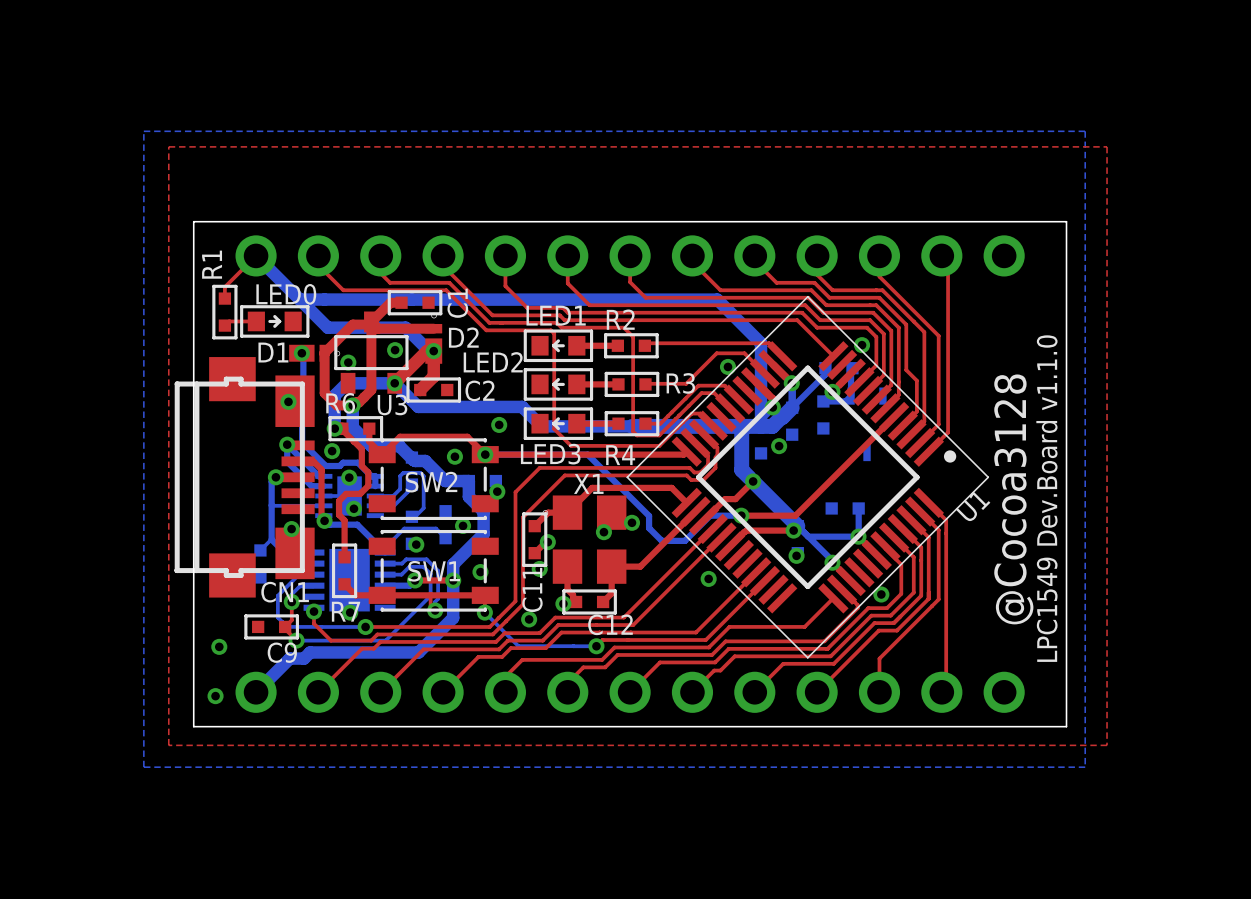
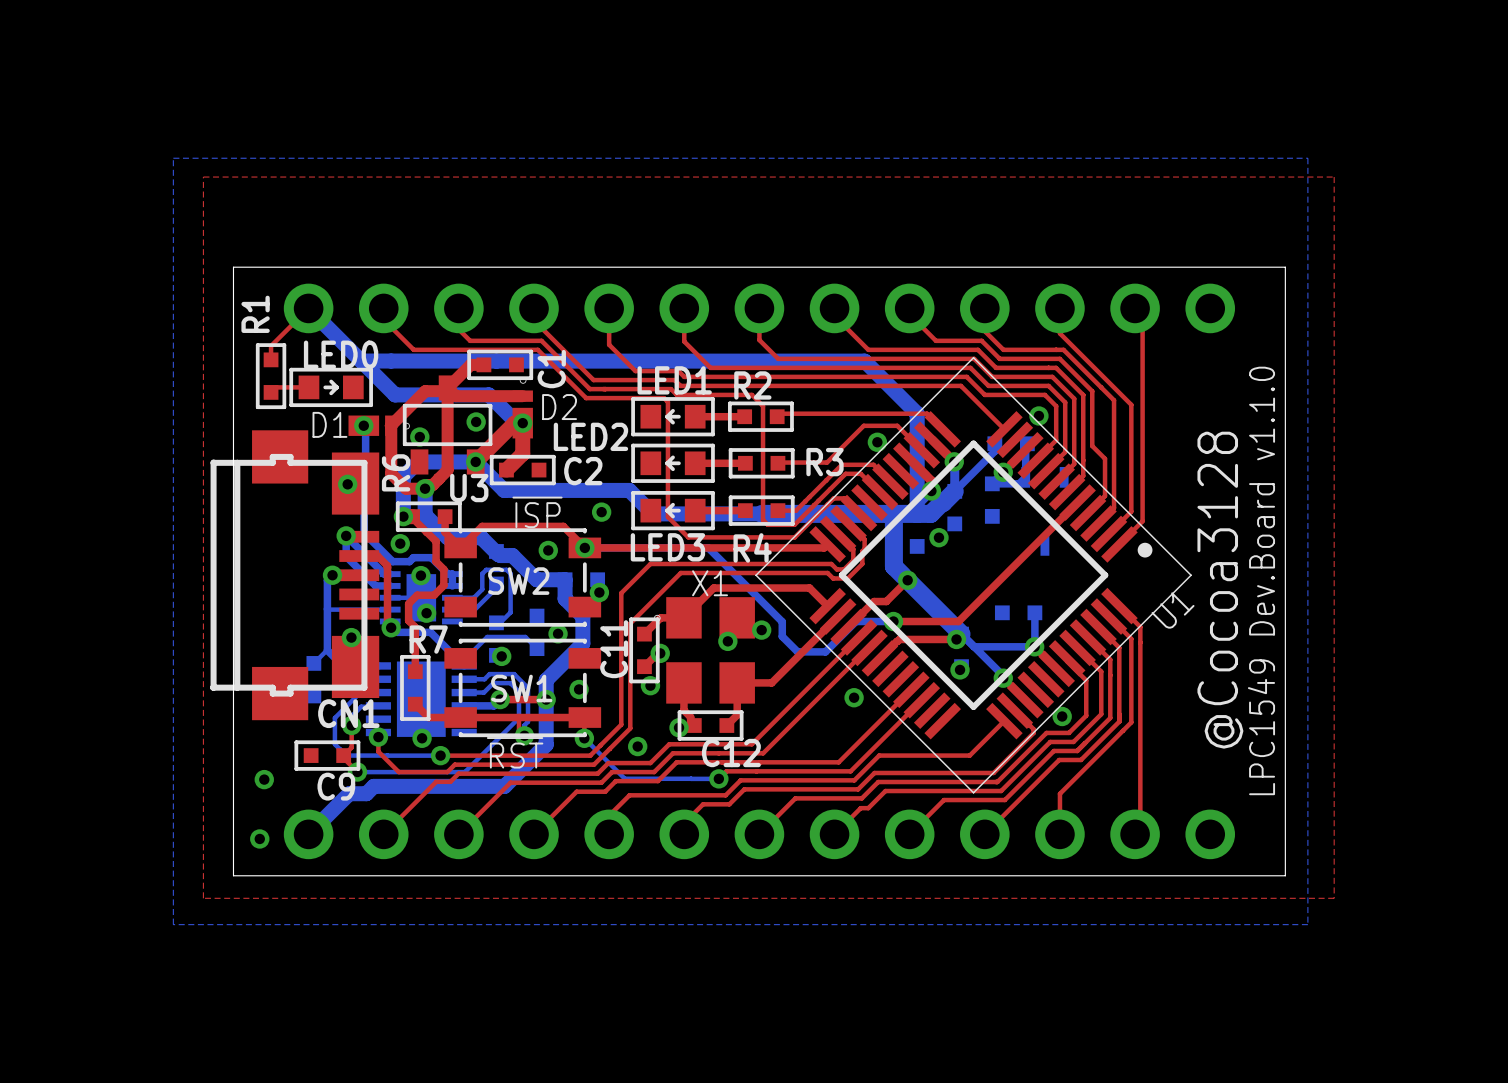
R6 name rotation: 0° (340, 403) -> 90° counterclockwise (396, 472)
text: none -> ~{ISP} (537, 512)
C11 name position: C11 (532, 589) -> C11 (614, 649)
R7 name position: R7 (346, 611) -> R7 (428, 639)
text: none -> ~{RST} (515, 752)

